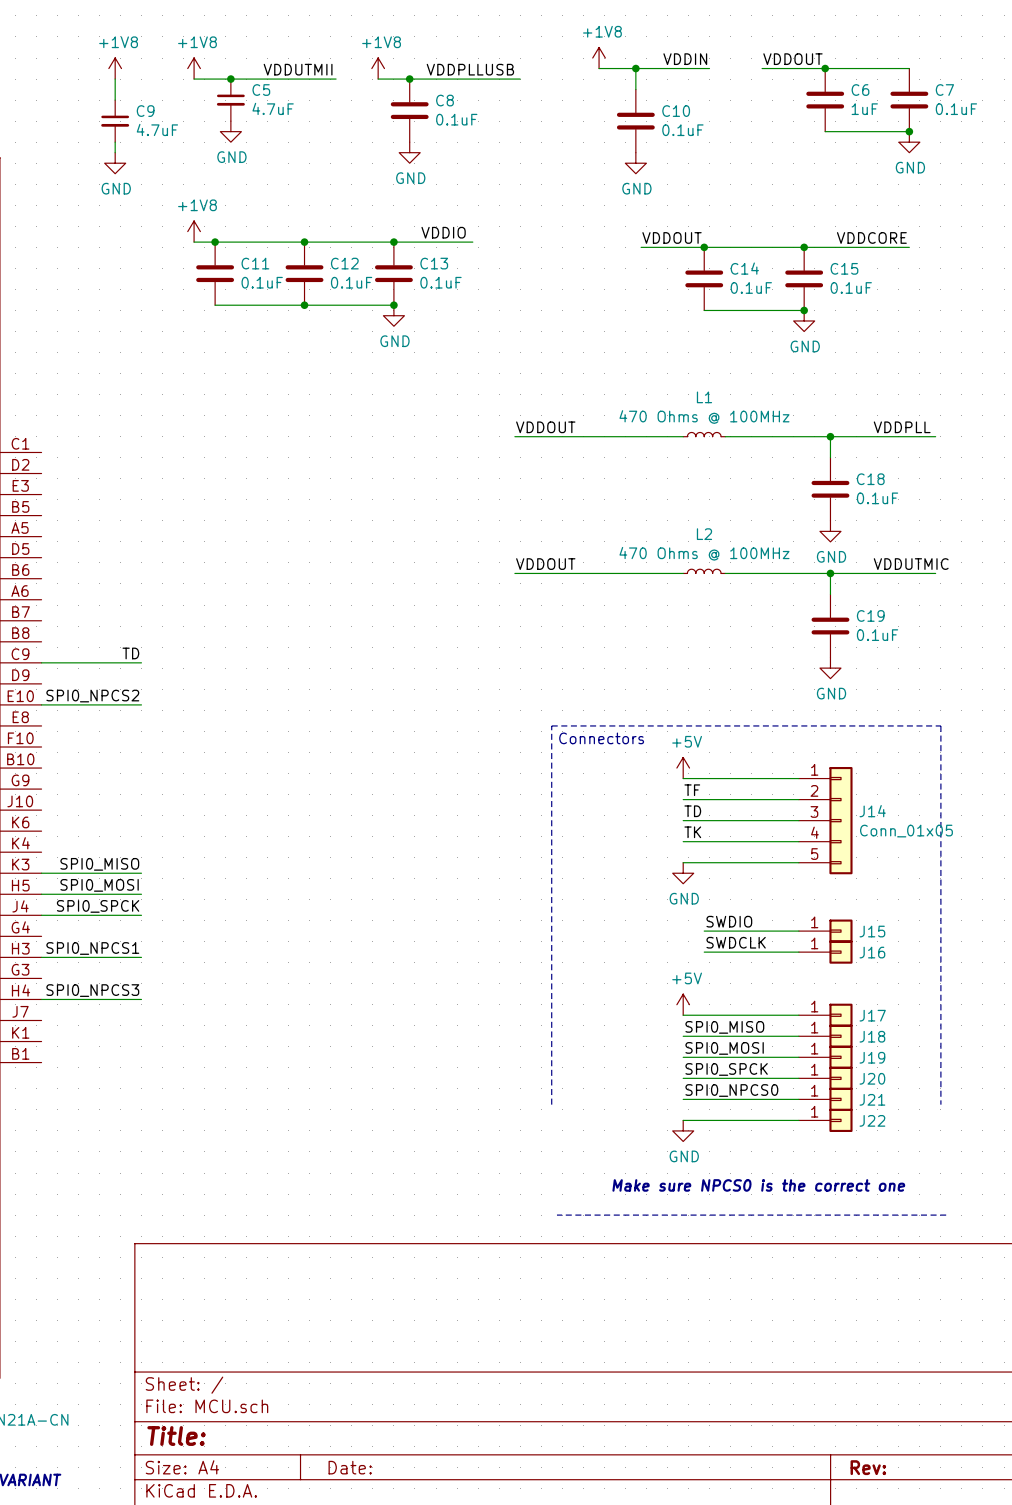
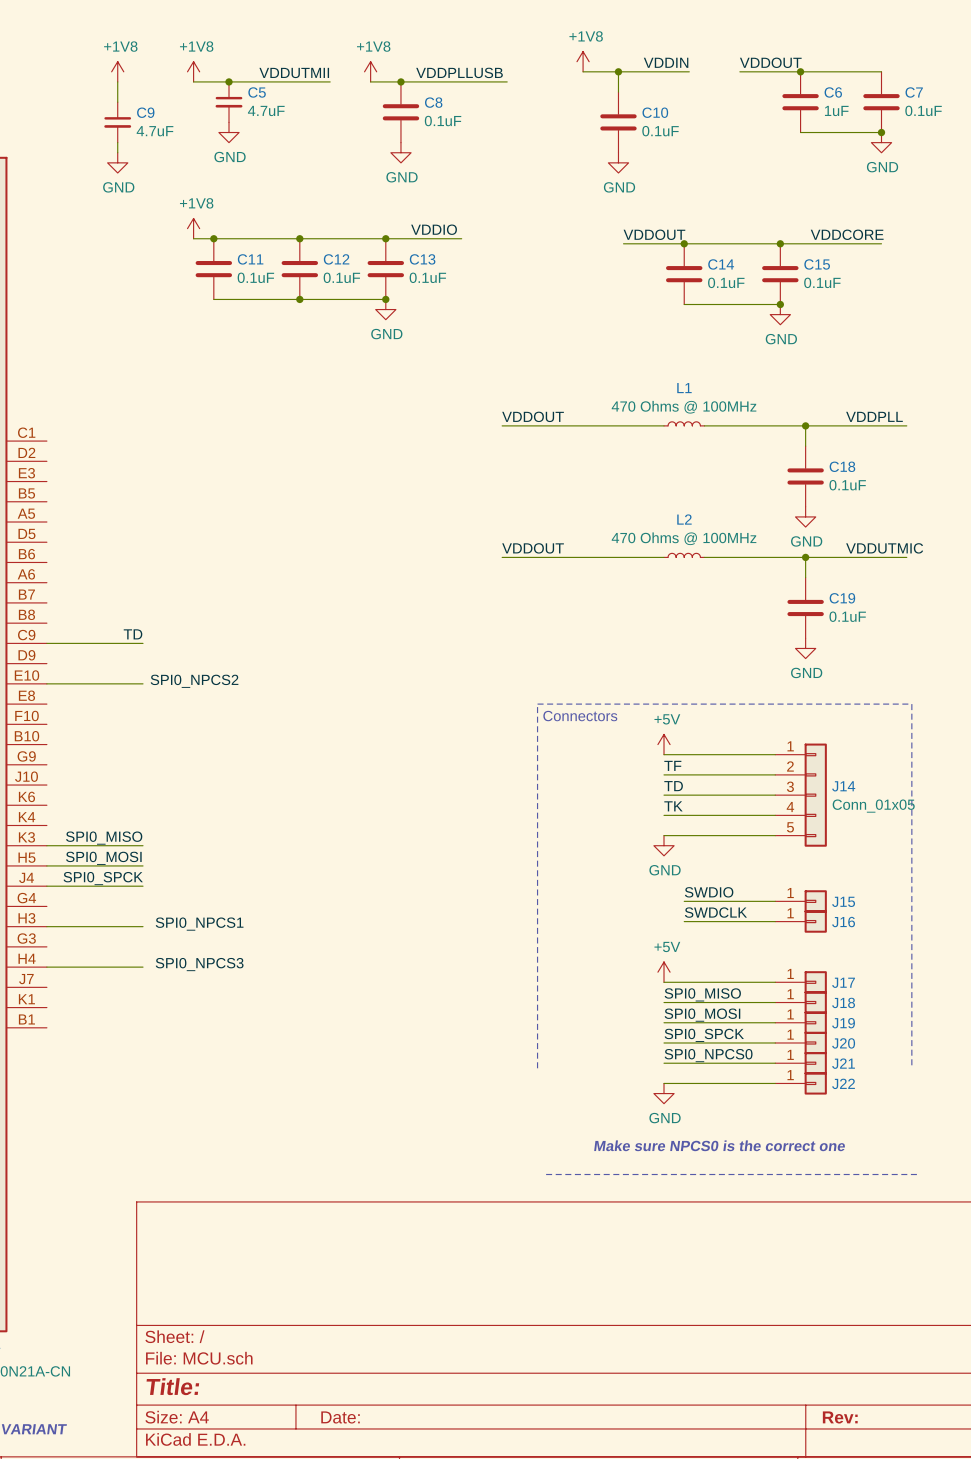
label position: SPI0_NPCS2 (92, 696) -> SPI0_NPCS2 (194, 681)
label position: SPI0_NPCS1 (92, 948) -> SPI0_NPCS1 (199, 924)
label position: SPI0_NPCS3 (92, 990) -> SPI0_NPCS3 (199, 964)

